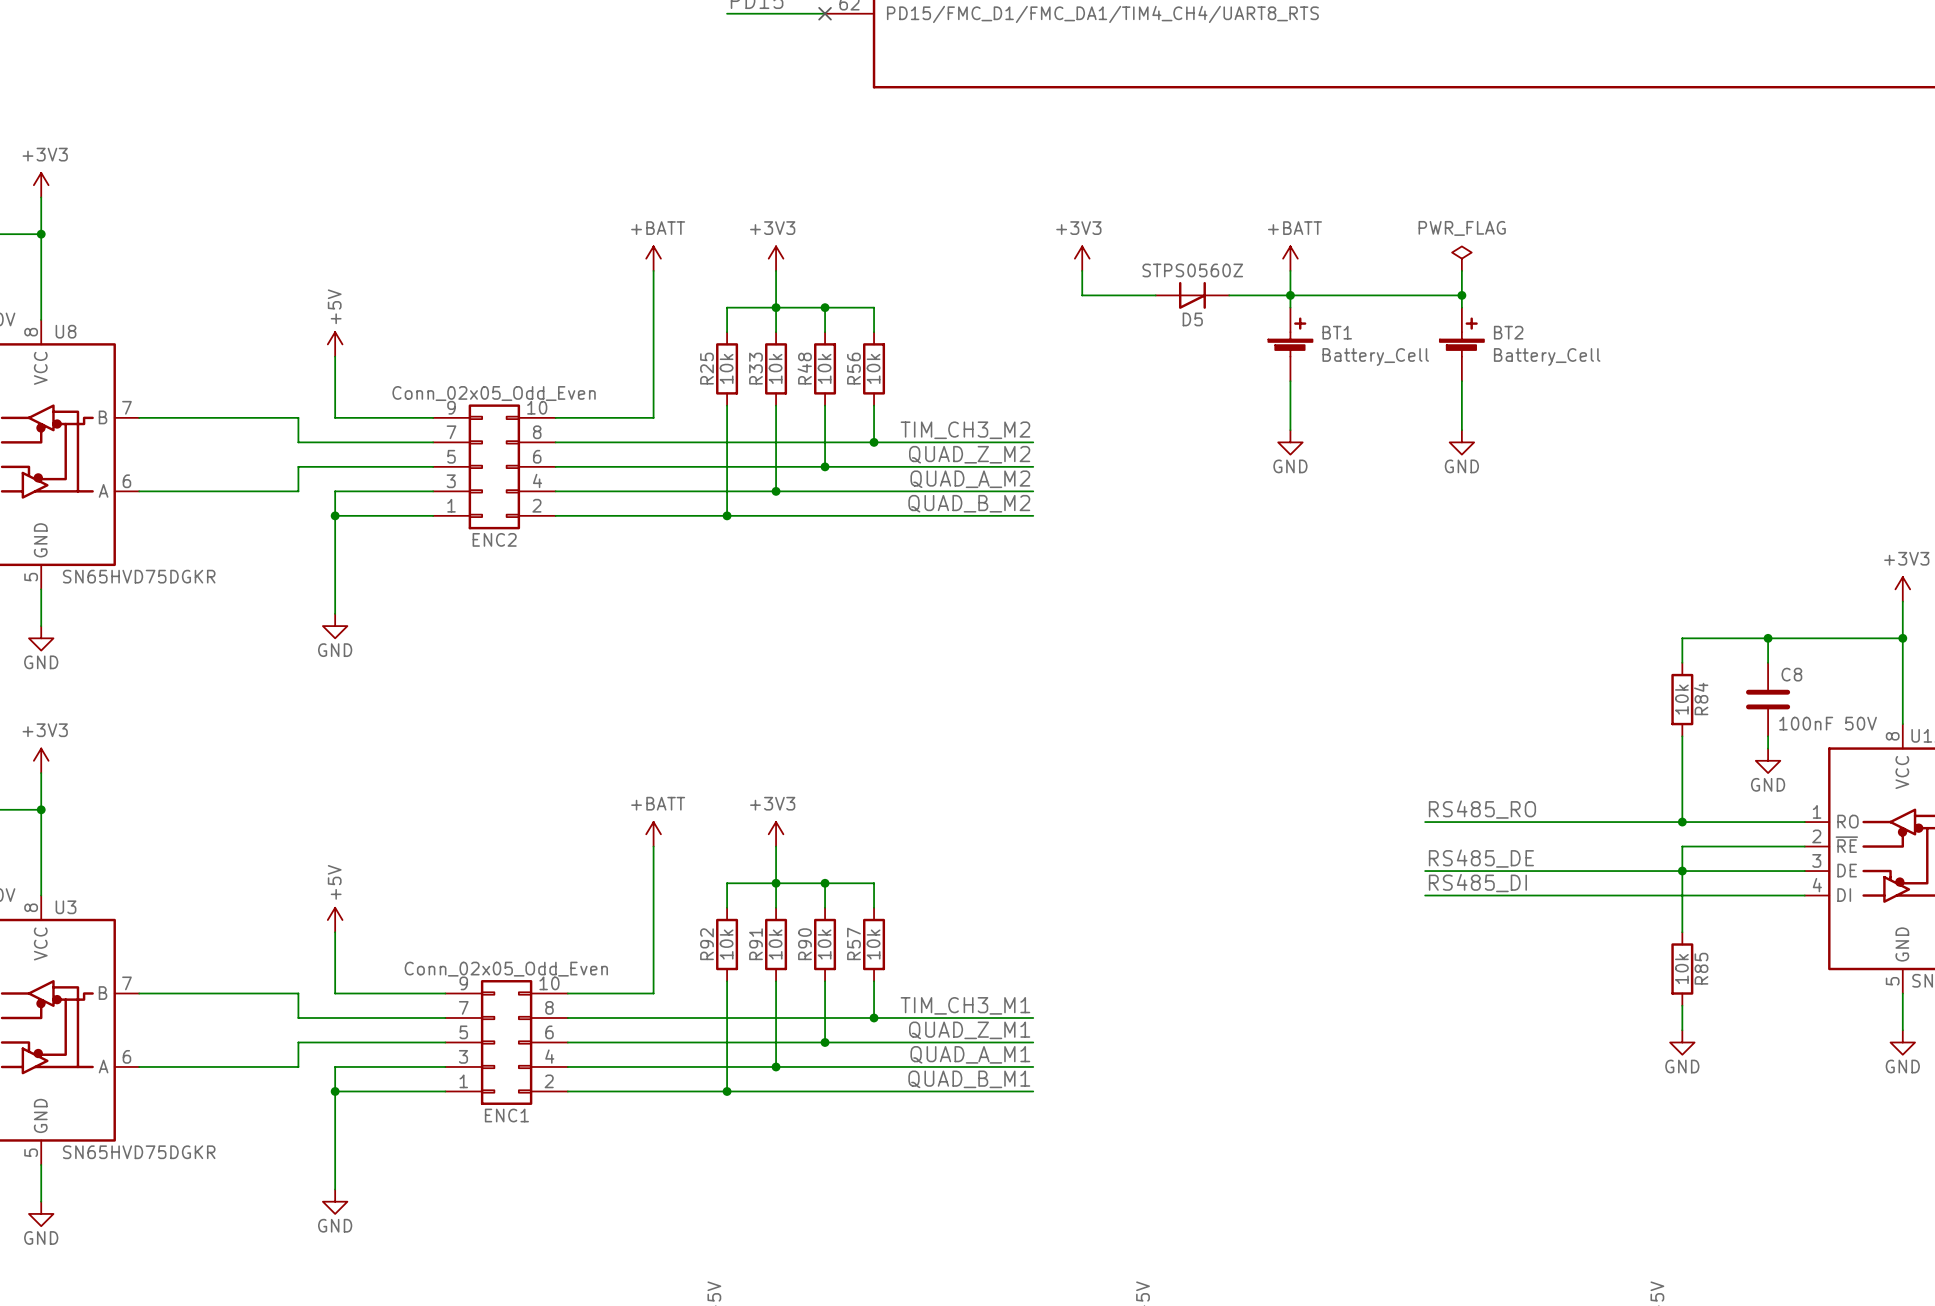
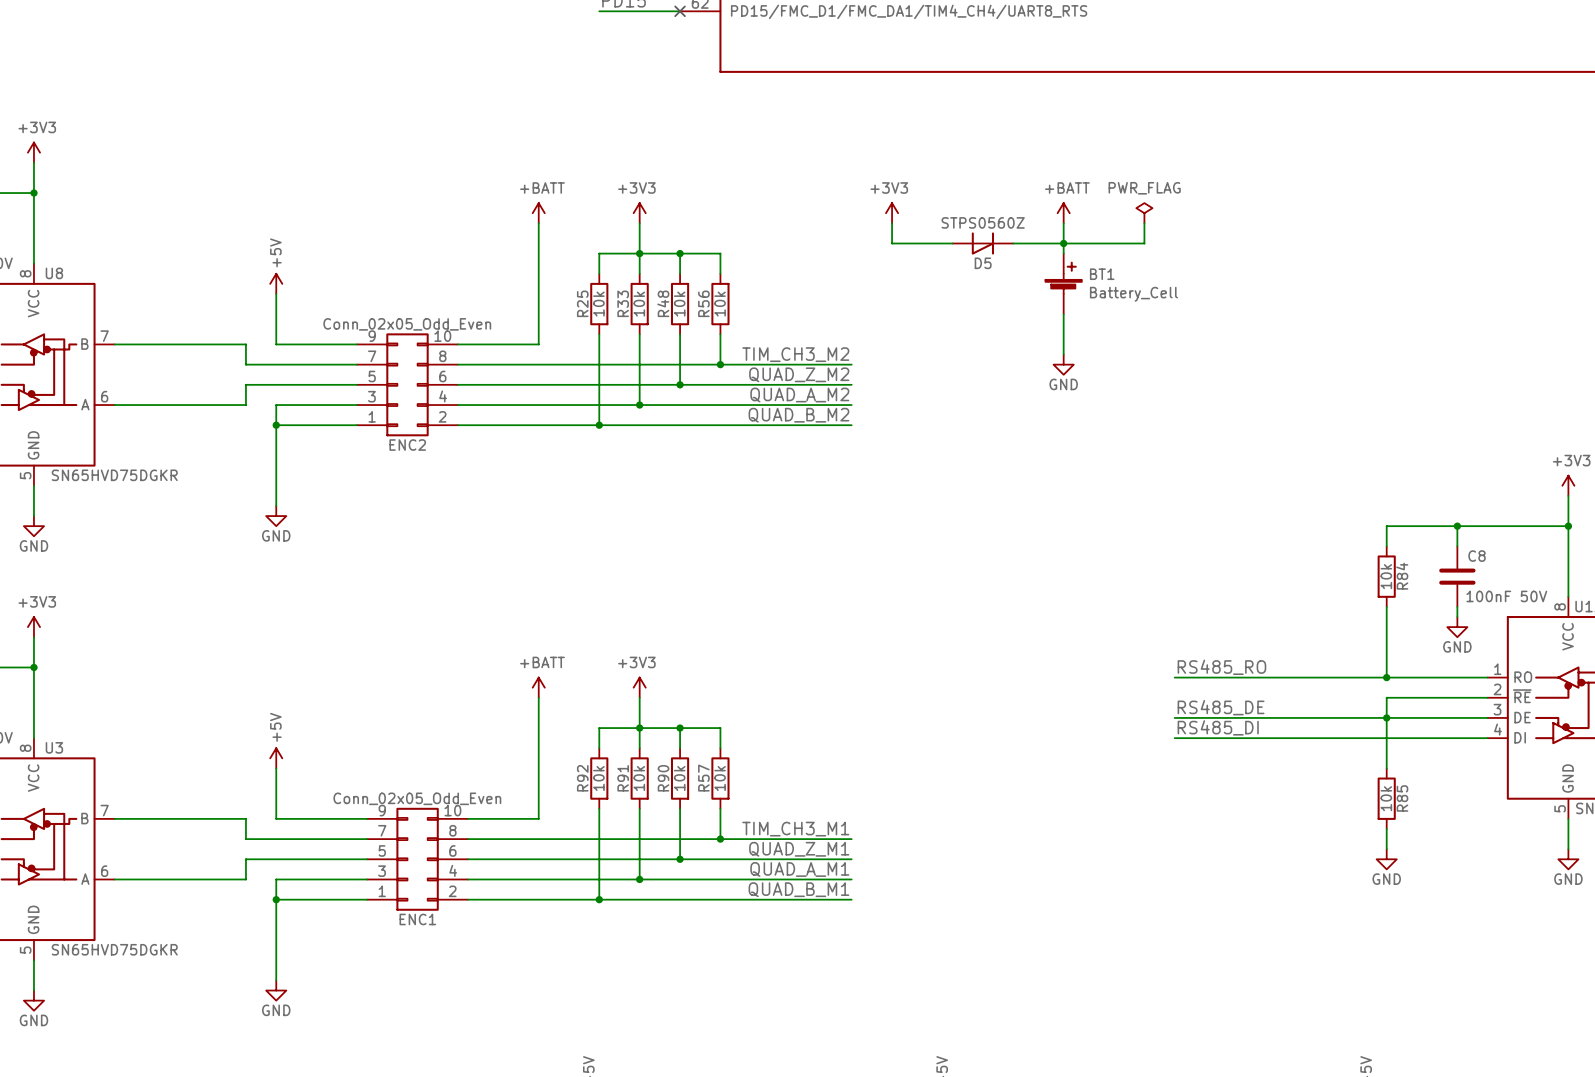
power symbol position: PWR_FLAG (1461, 258) -> PWR_FLAG (1144, 213)
wire: (1461, 270) (1461, 307) -> none
wire: (1388, 295) (1461, 295) -> (1144, 243) (1144, 223)
junction: (1461, 295) -> none
BT2: Battery_Cell (1461, 344) -> none
wire: (1461, 381) (1461, 430) -> none
power symbol: GND (1461, 442) -> none

